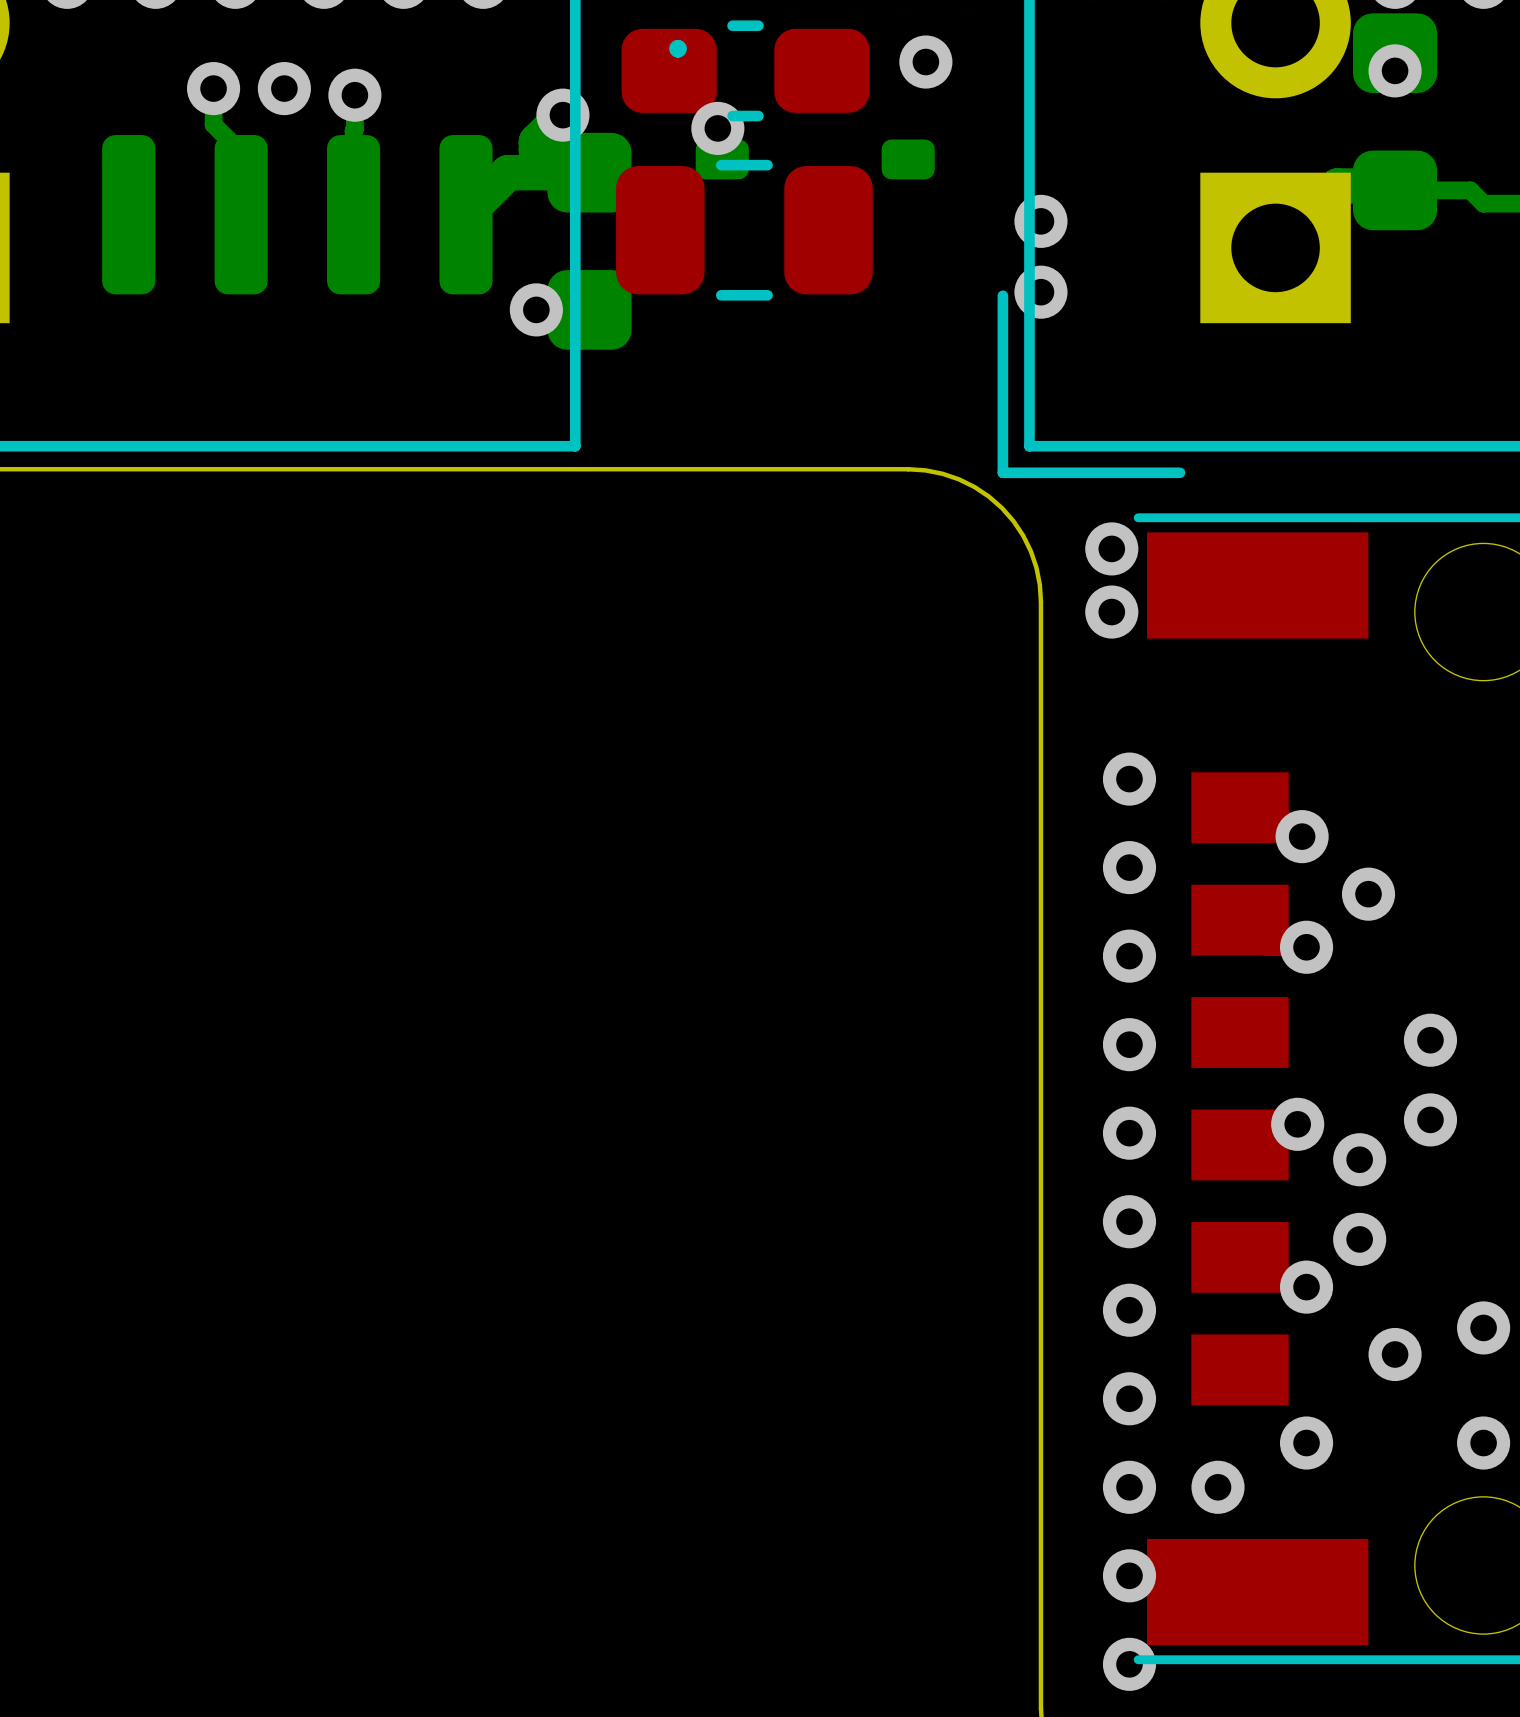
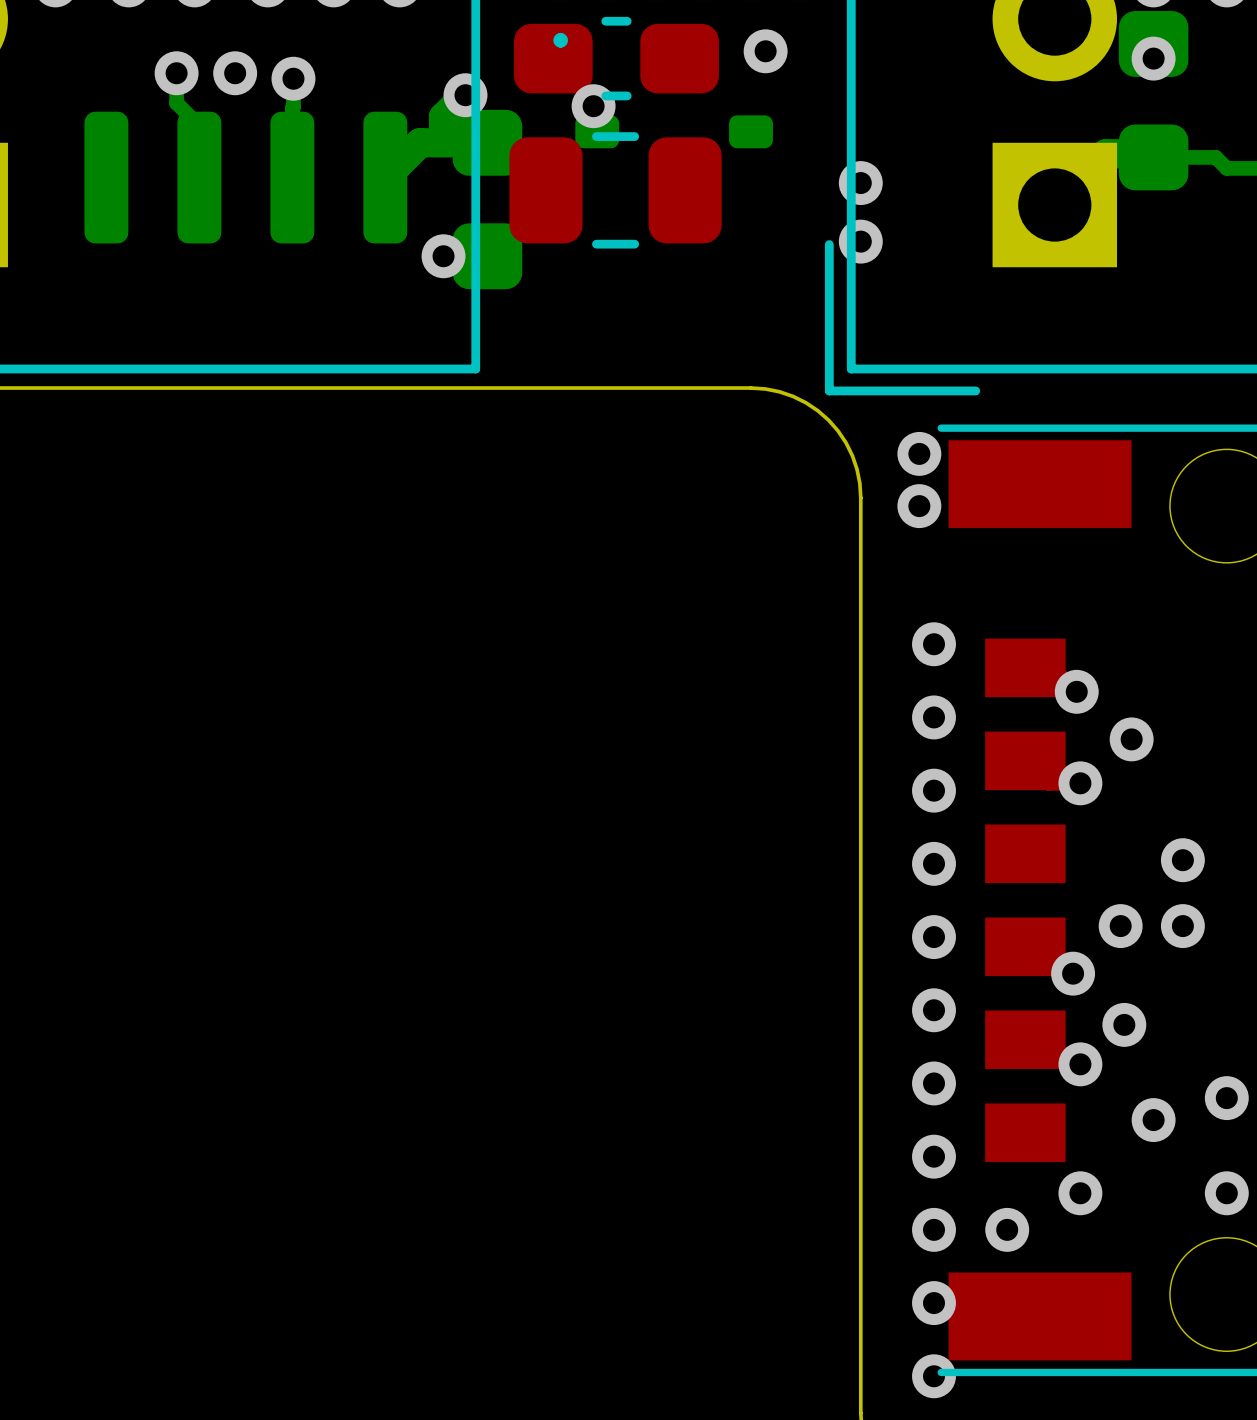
via position: (1297, 1124) -> (1073, 973)
via position: (1359, 1159) -> (1120, 926)

